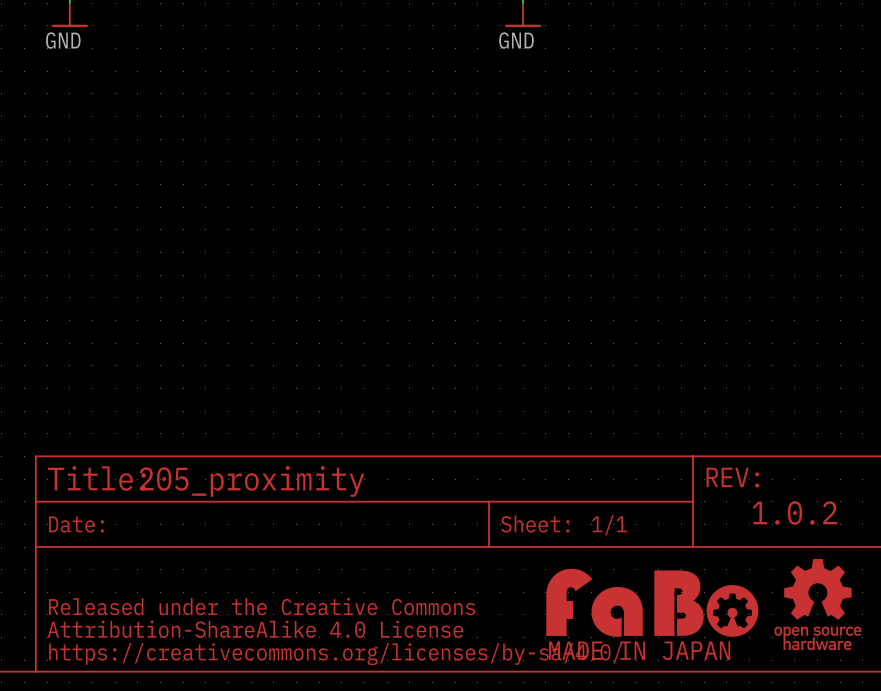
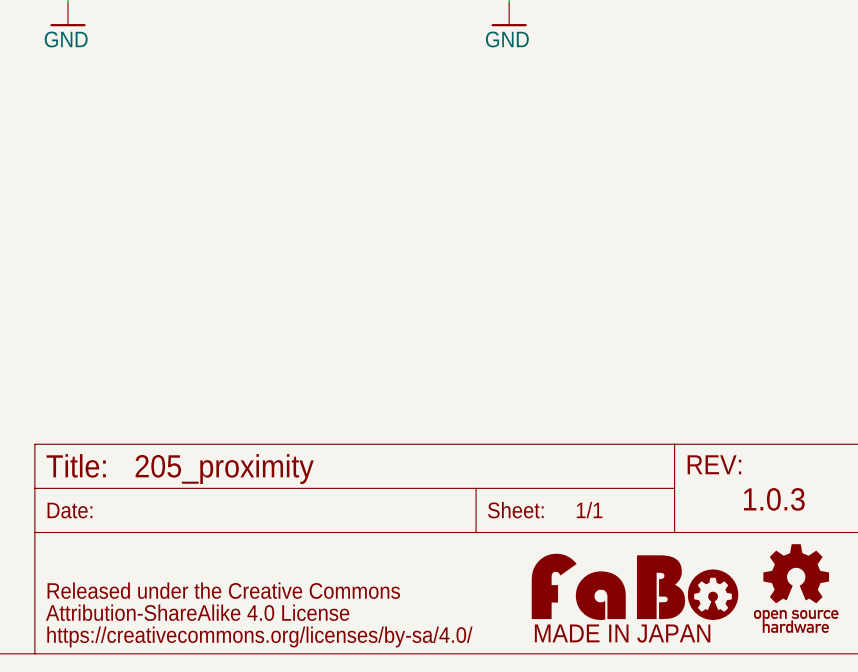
text: 1.0.2 (794, 513) -> 1.0.3 (774, 499)

